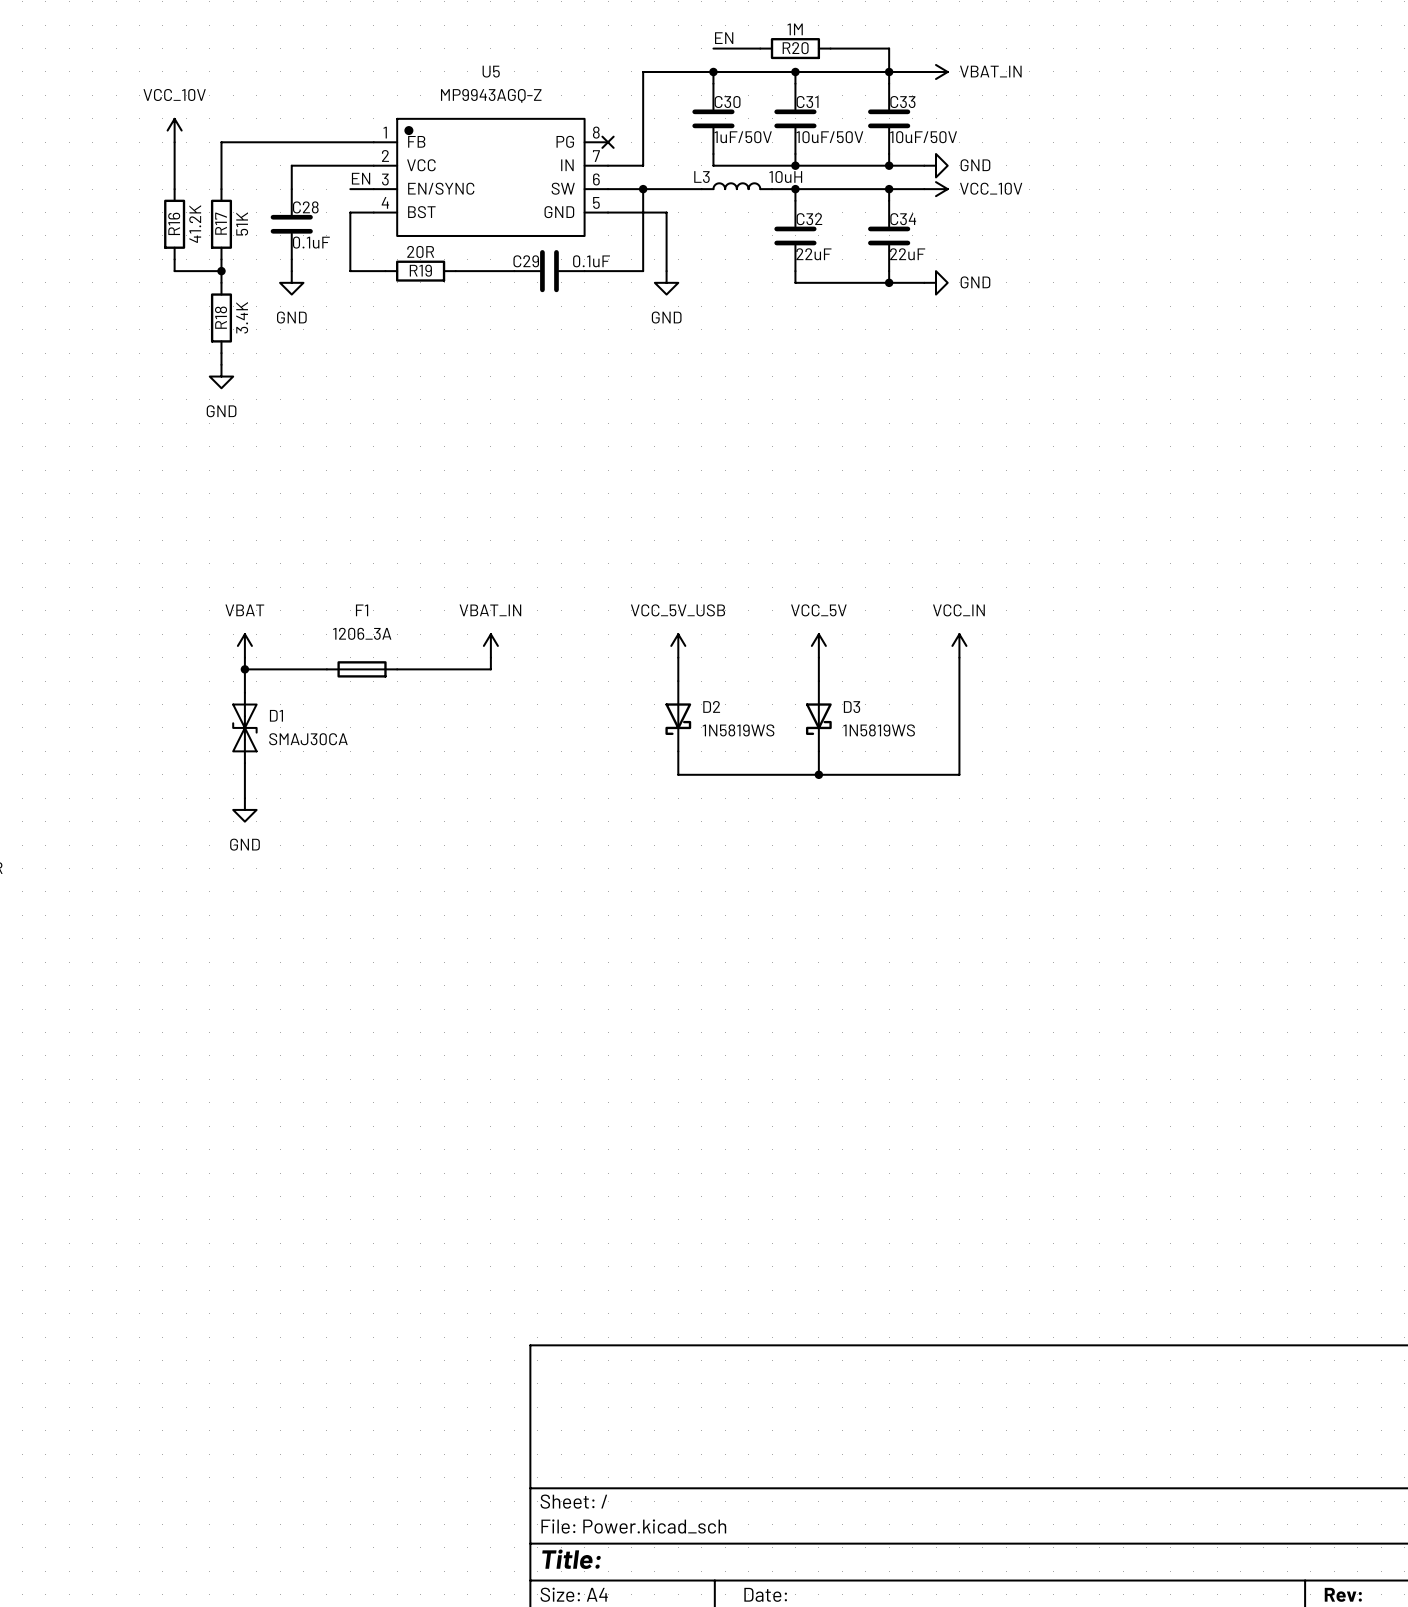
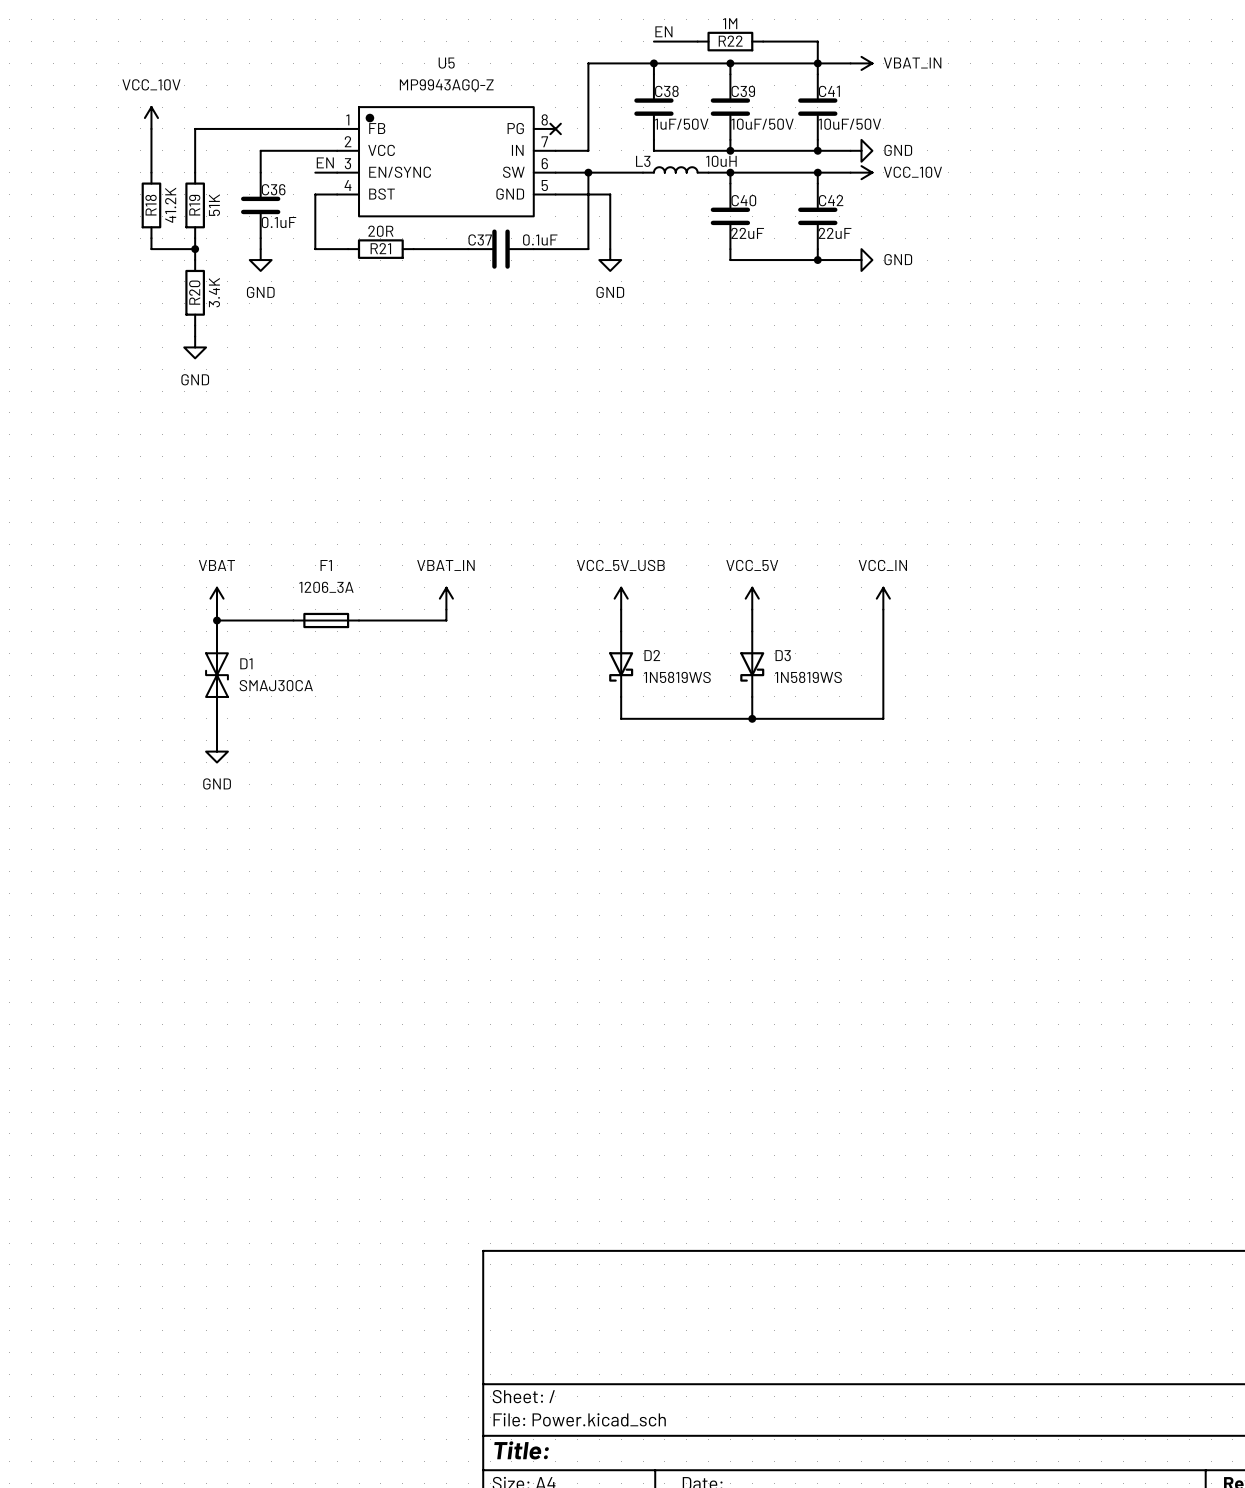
R20 name: R20 (795, 48) -> R22 (730, 41)
C30 name: C30 (727, 102) -> C38 (666, 91)
C31 name: C31 (807, 102) -> C39 (743, 91)
C33 name: C33 (902, 102) -> C41 (829, 91)
C28 name: C28 (305, 207) -> C36 (273, 189)
C32 name: C32 (809, 219) -> C40 (743, 200)
C34 name: C34 (903, 219) -> C42 (831, 200)
R16 name: R16 (174, 223) -> R18 (151, 205)
R17 name: R17 (221, 223) -> R19 (194, 205)
C29 name: C29 (526, 261) -> C37 (480, 239)
R19 name: R19 (420, 270) -> R21 (380, 248)
R18 name: R18 (221, 317) -> R20 (194, 292)

